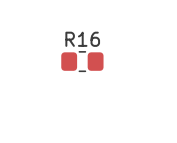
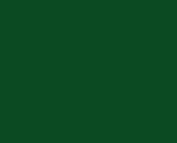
R16: (82, 61) -> none

